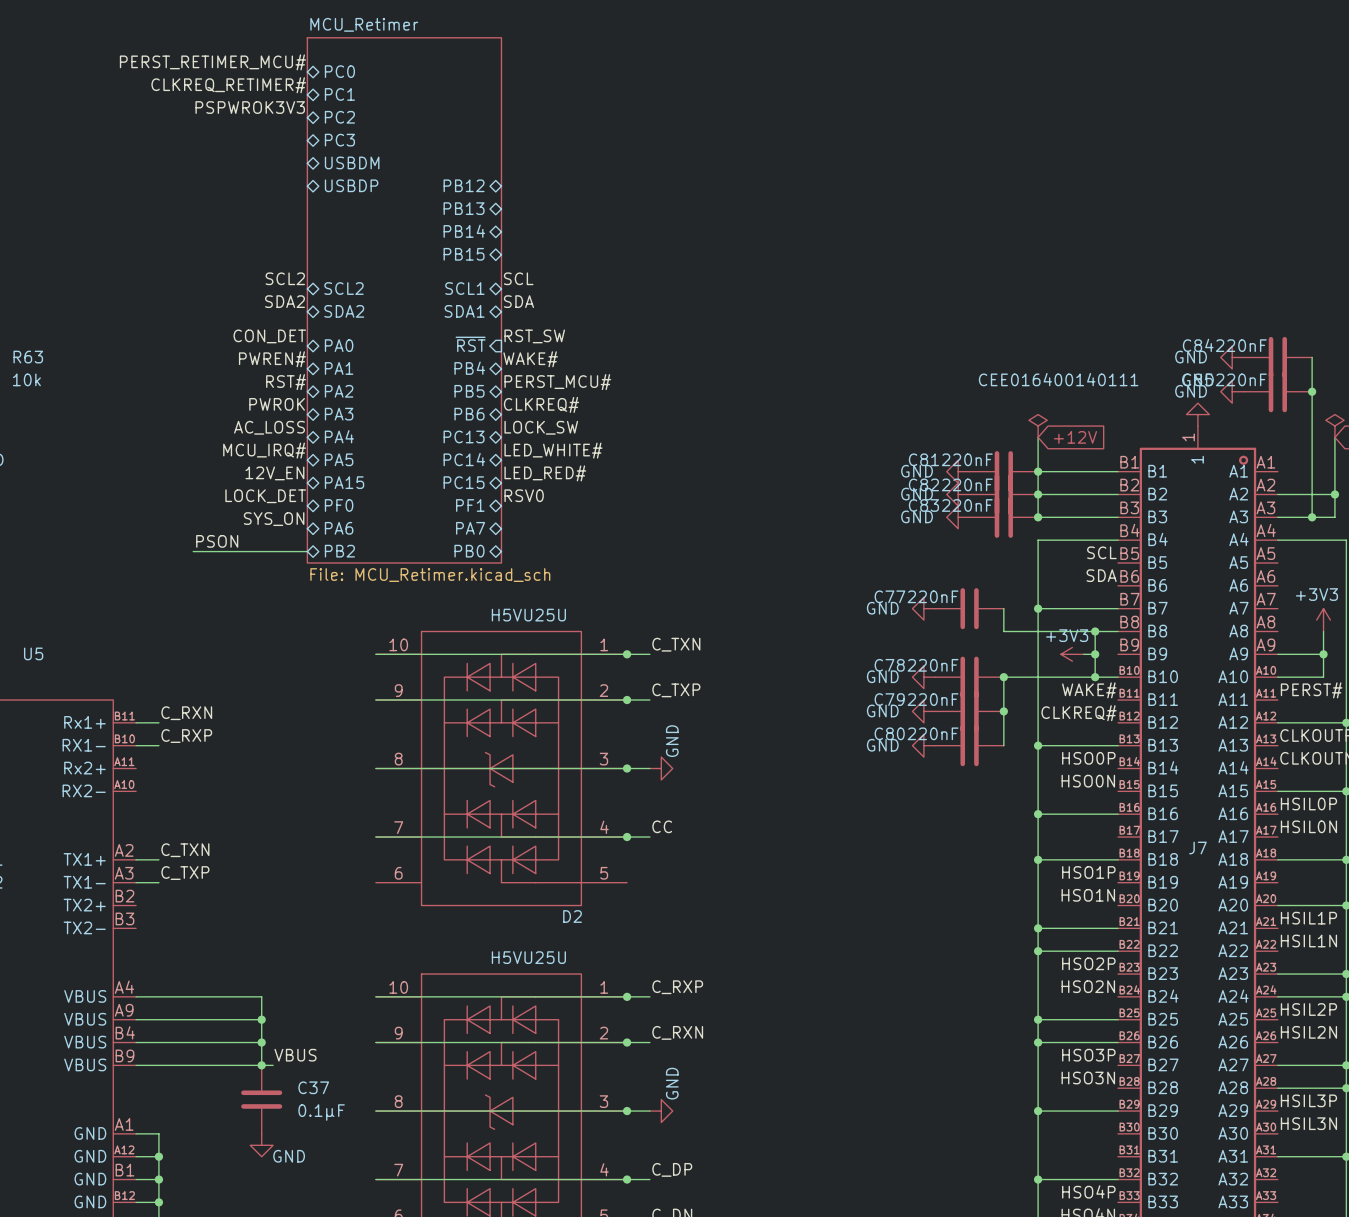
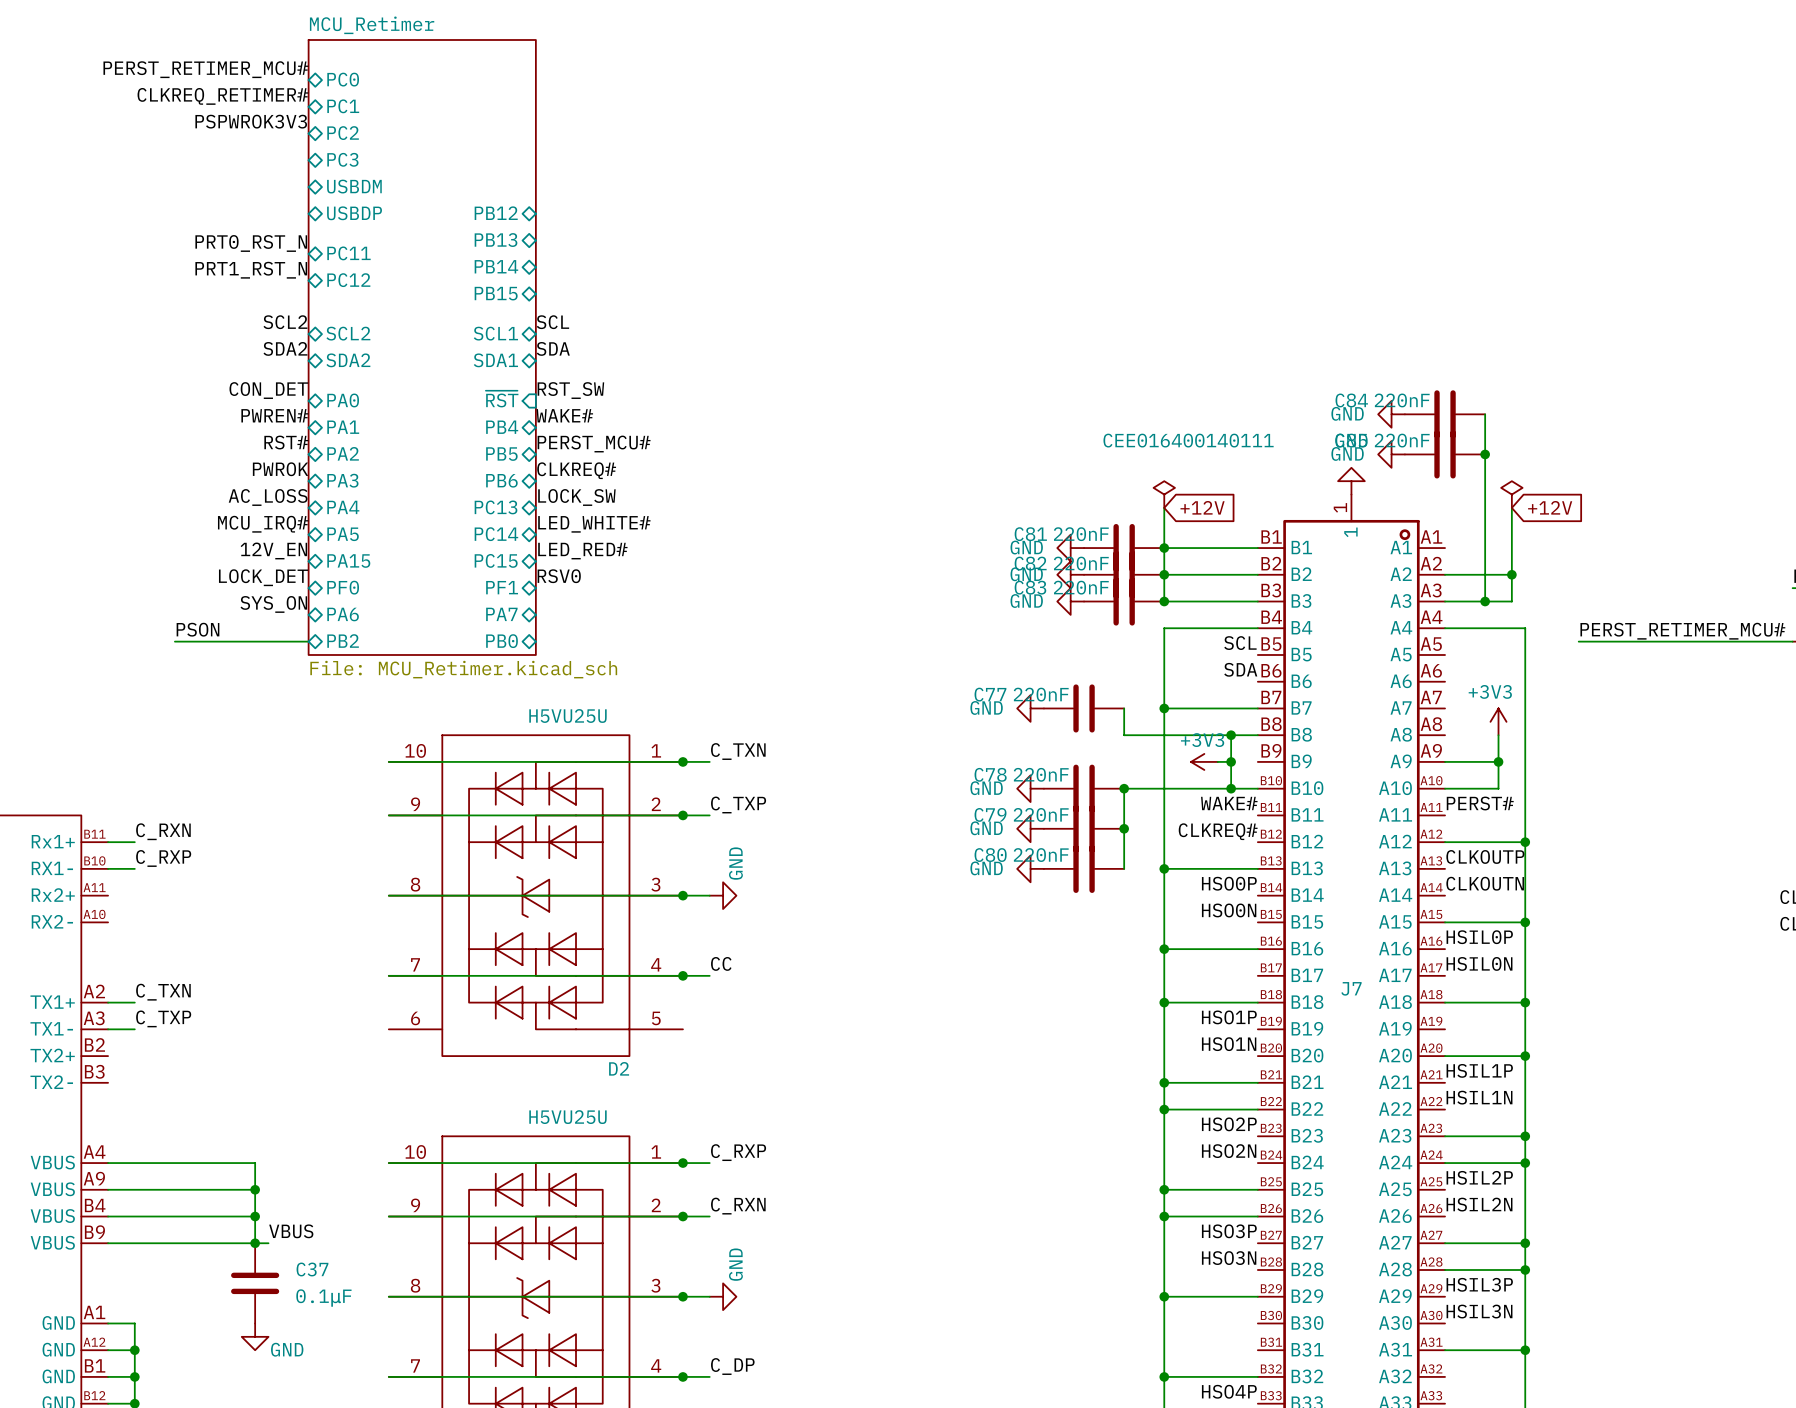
label: none -> PRT0_RST_N (251, 243)
sheet pin: none -> PC11 (348, 253)
label: none -> PRT1_RST_N (251, 270)
sheet pin: none -> PC12 (348, 280)

